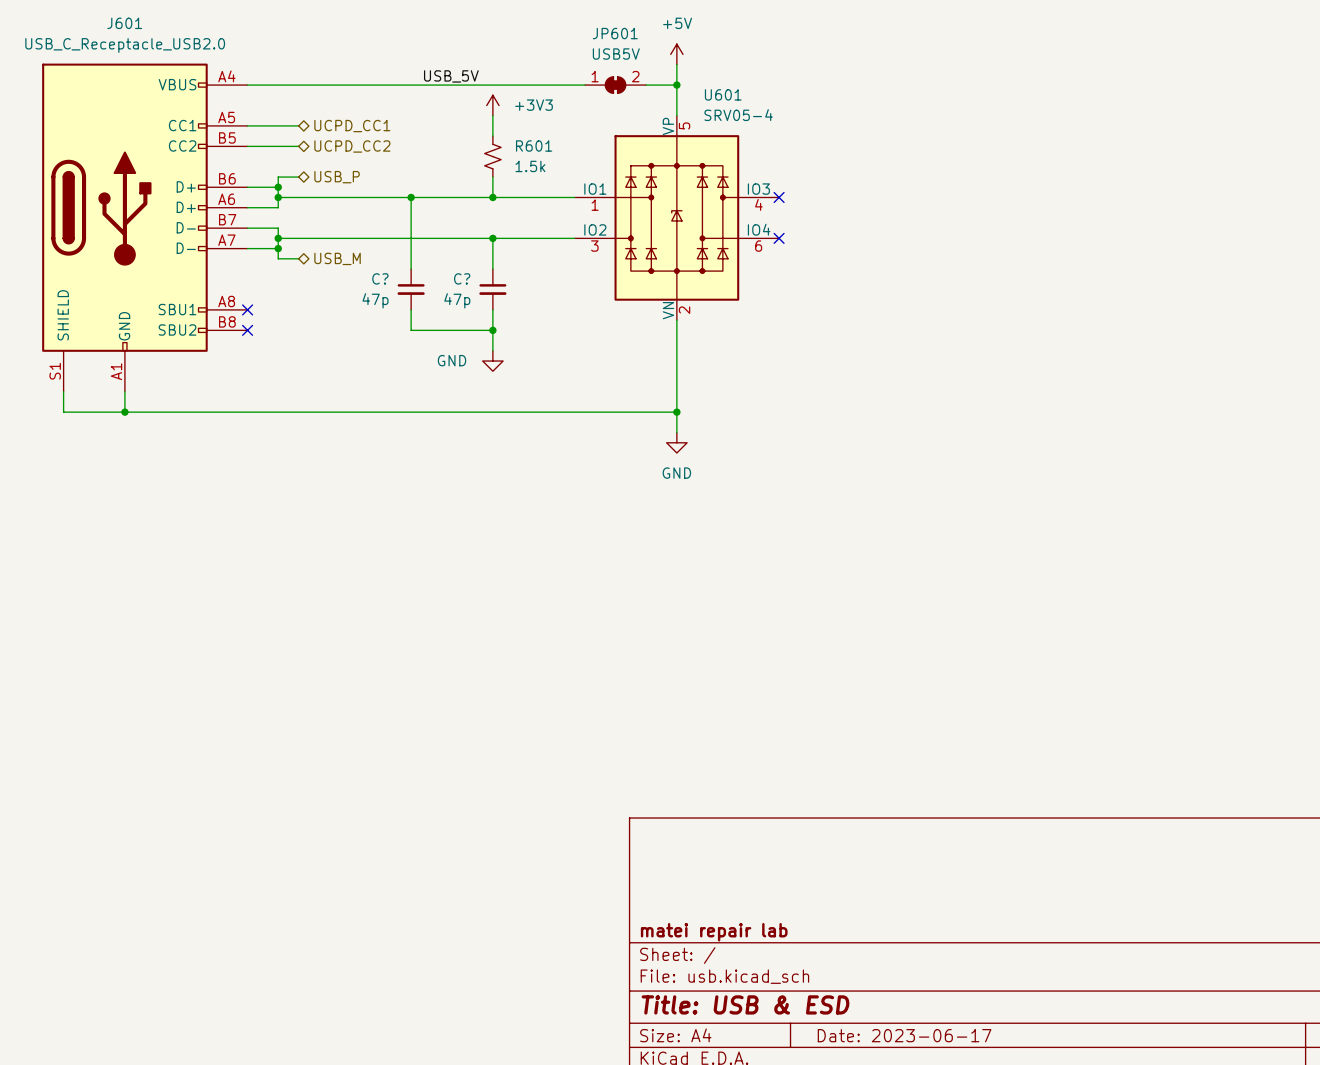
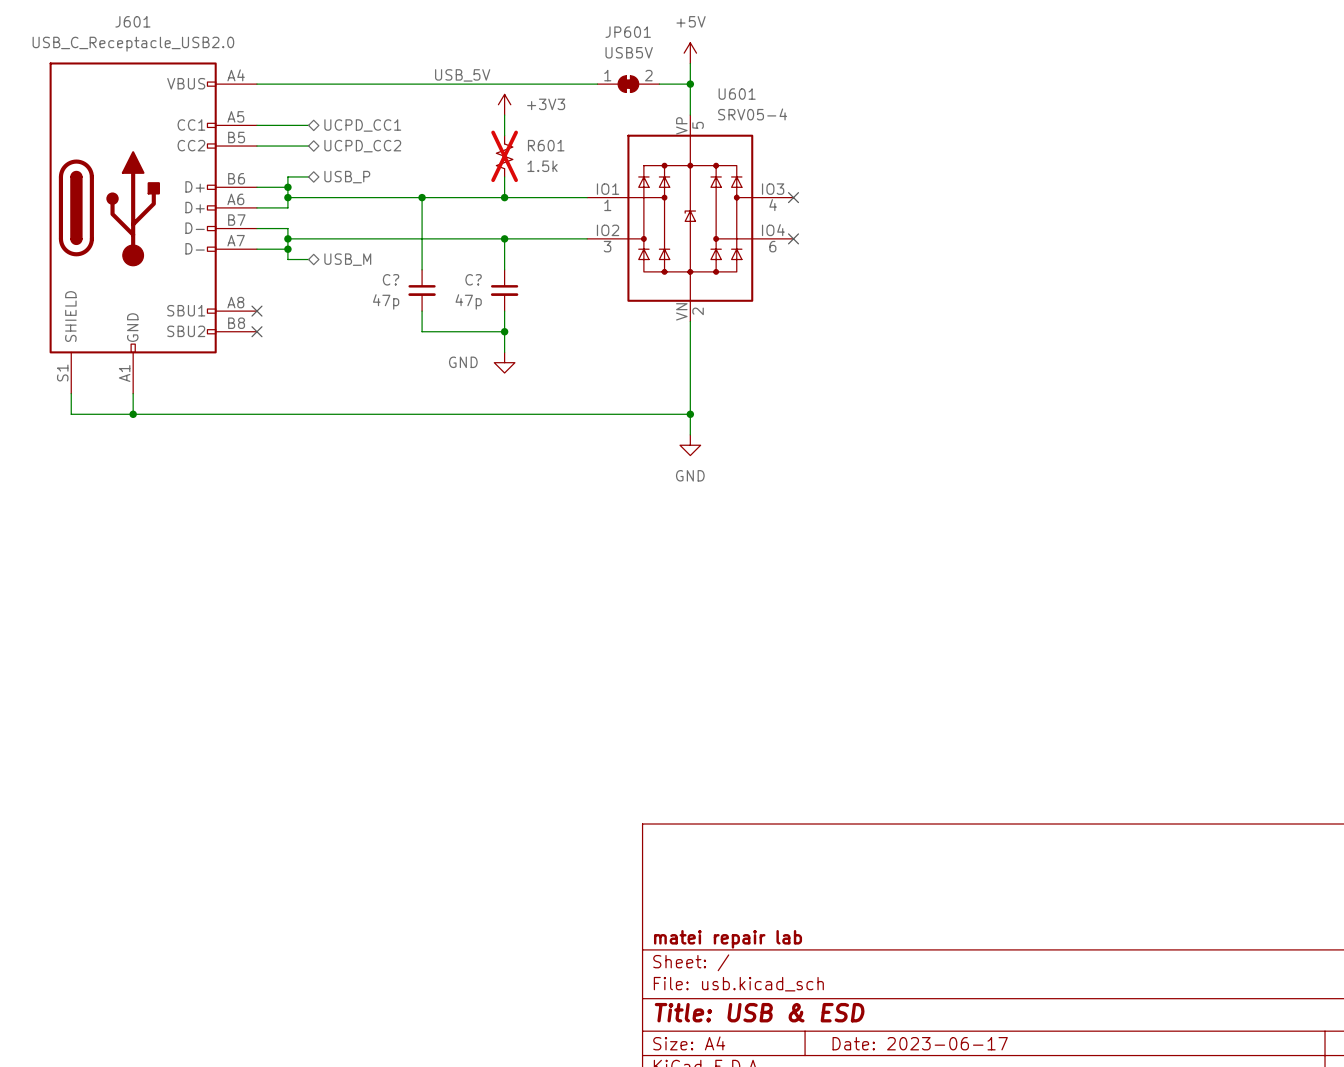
R601 do-not-place cross: none -> (504, 156)

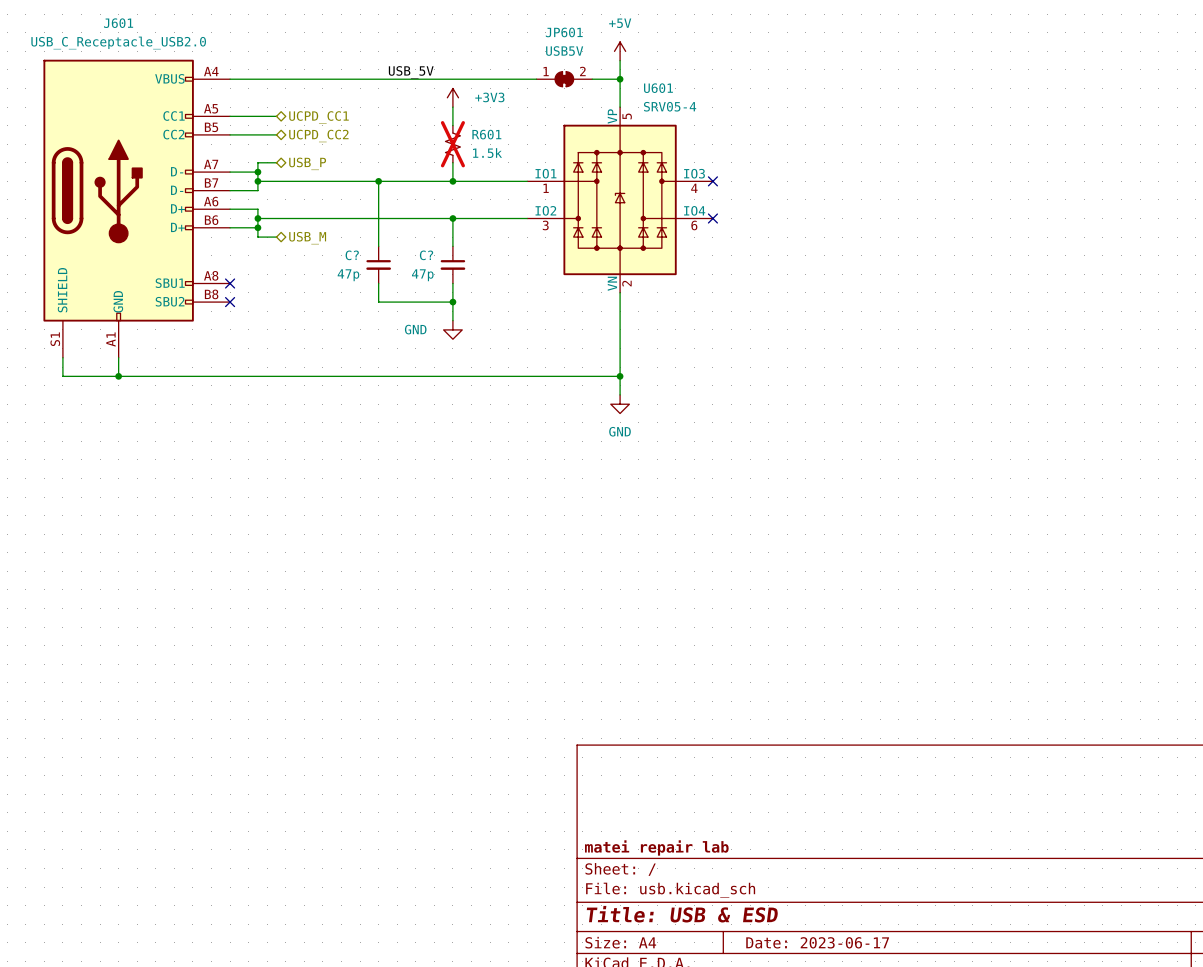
J601 pin number: B6 (236, 178) -> A7 (211, 164)
J601 pin name: D+ (195, 186) -> D- (177, 171)
J601 pin number: A6 (235, 199) -> B7 (211, 182)
J601 pin name: D+ (195, 207) -> D- (177, 190)
J601 pin number: B7 (236, 220) -> A6 (211, 201)
J601 pin name: D- (195, 228) -> D+ (177, 208)
J601 pin number: A7 (236, 240) -> B6 (211, 220)
J601 pin name: D- (195, 248) -> D+ (177, 227)

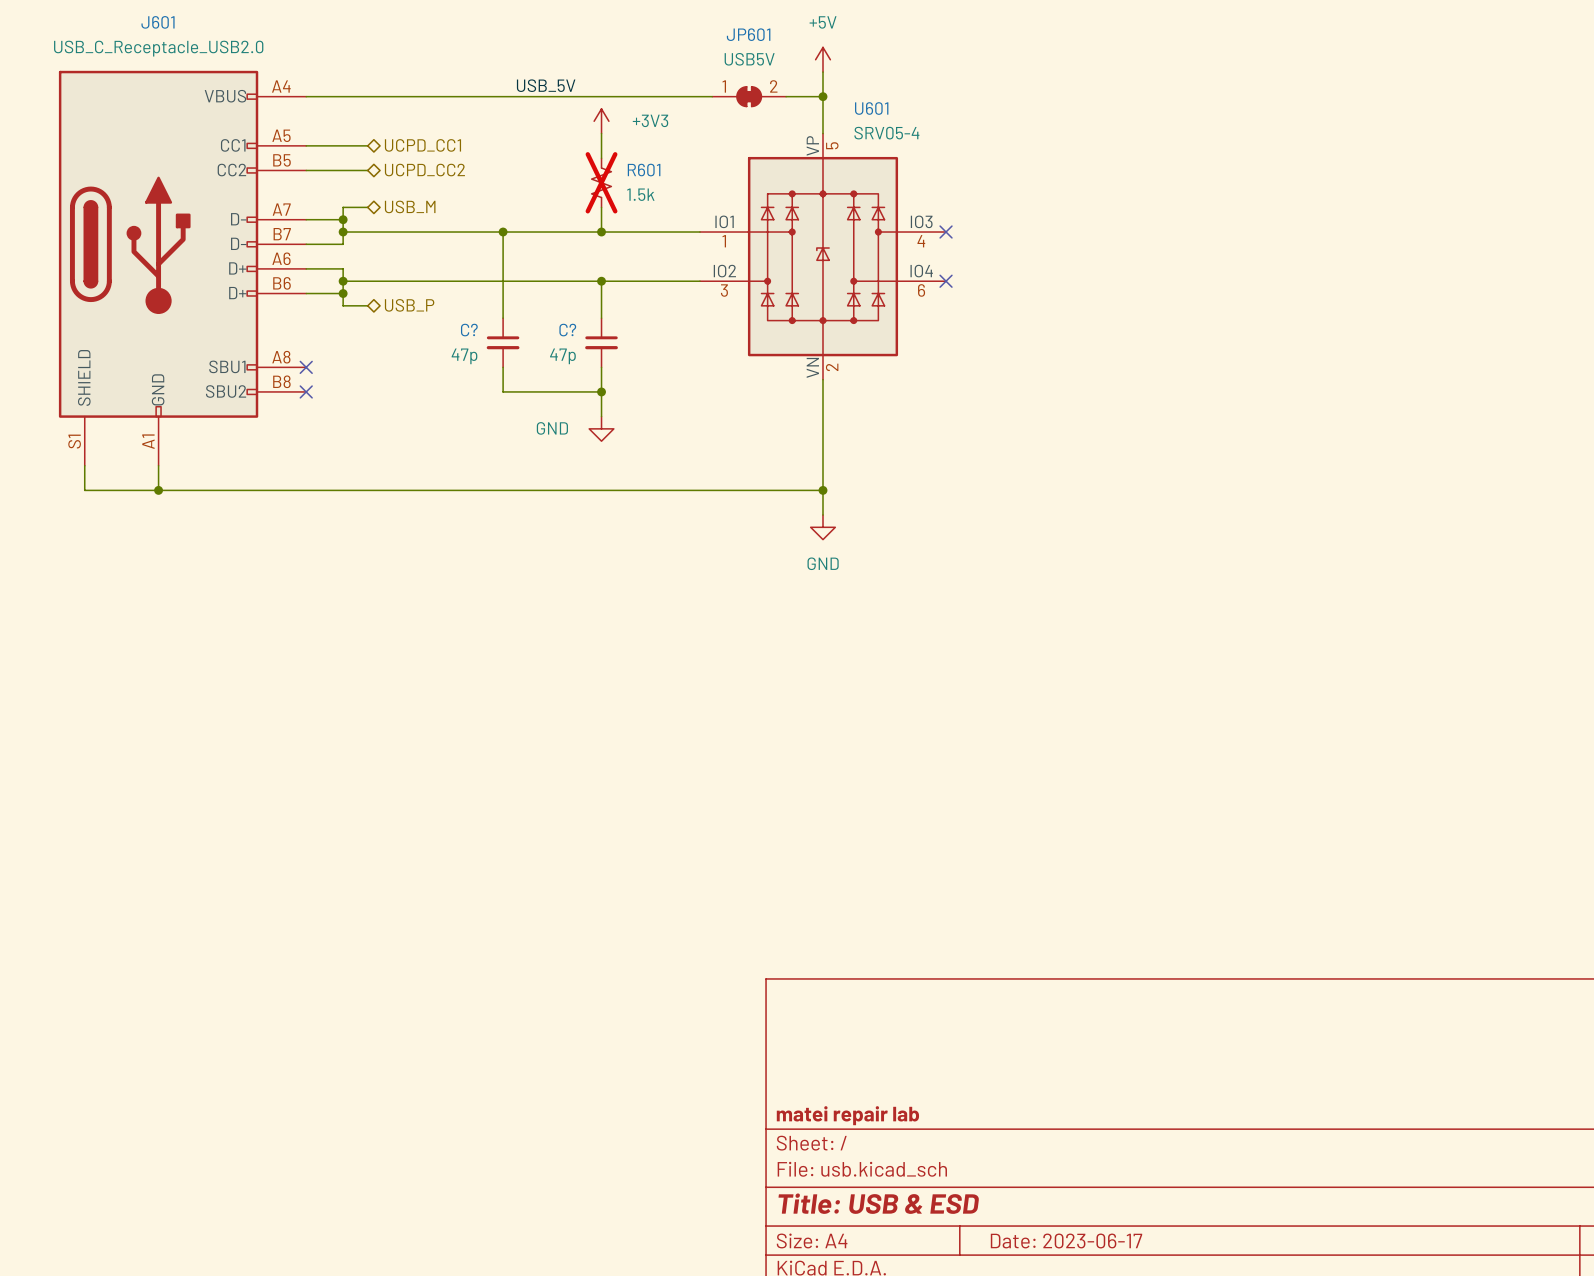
hierarchical label: USB_P (307, 163) -> USB_M (410, 206)
hierarchical label: USB_M (307, 238) -> USB_P (409, 305)

